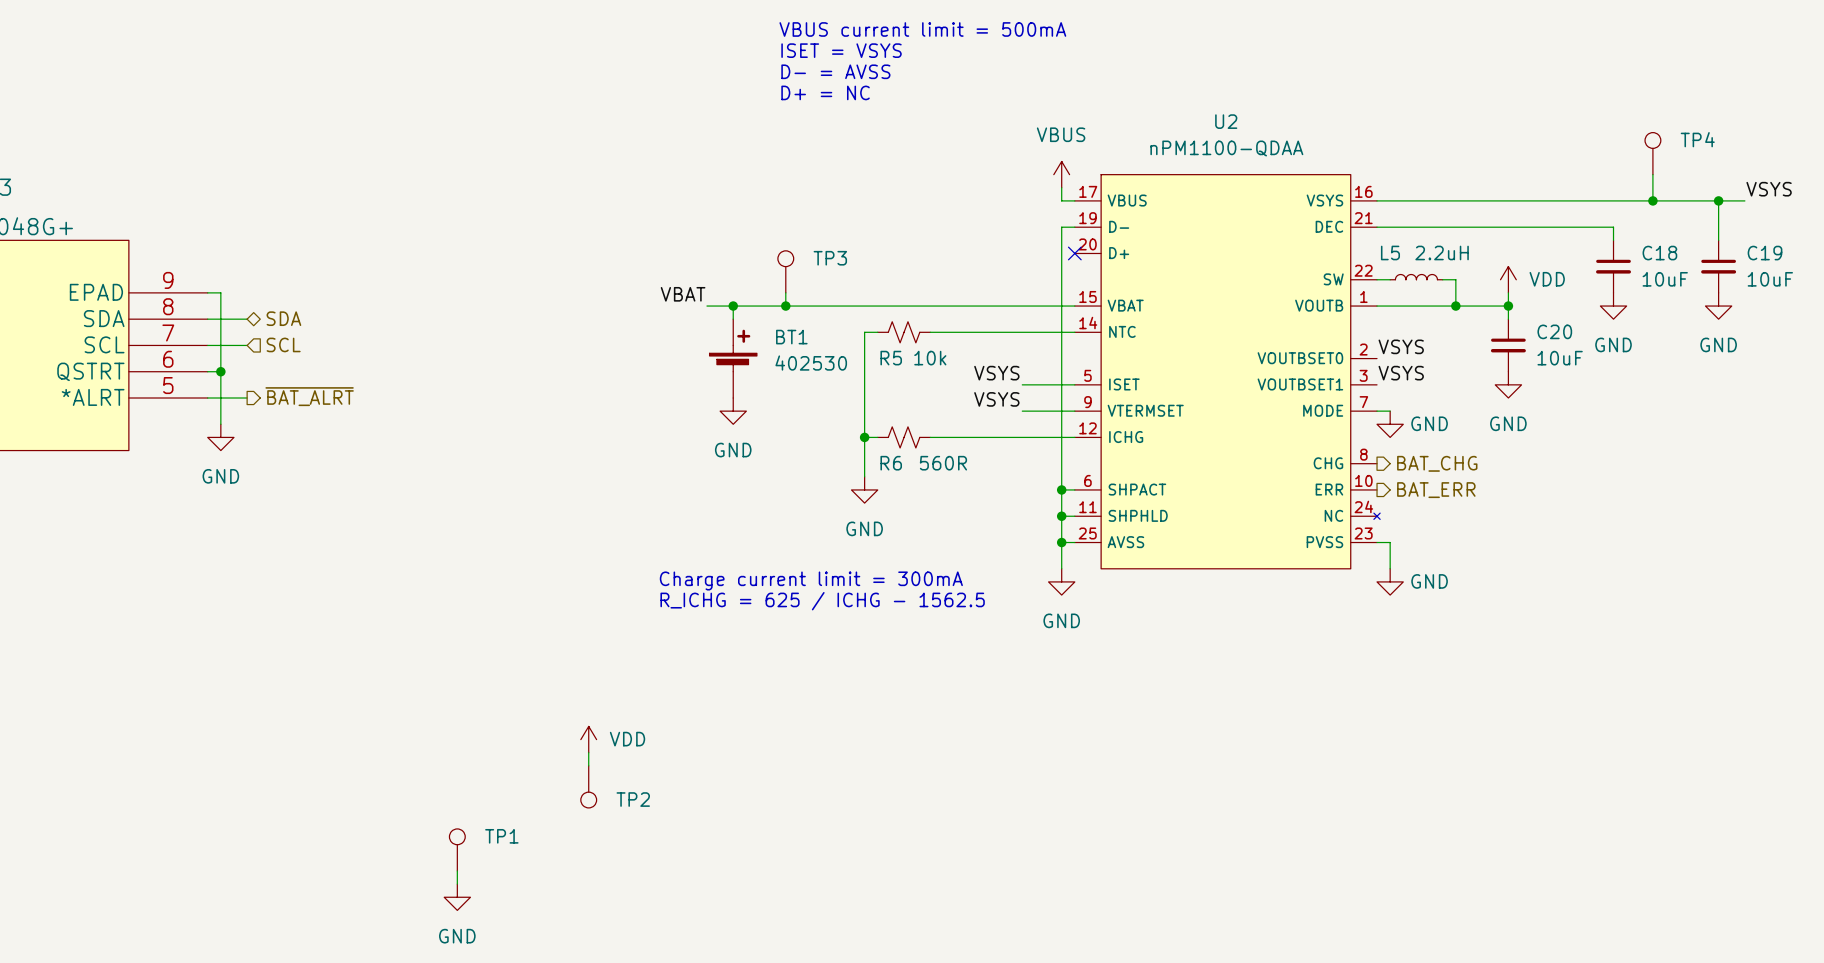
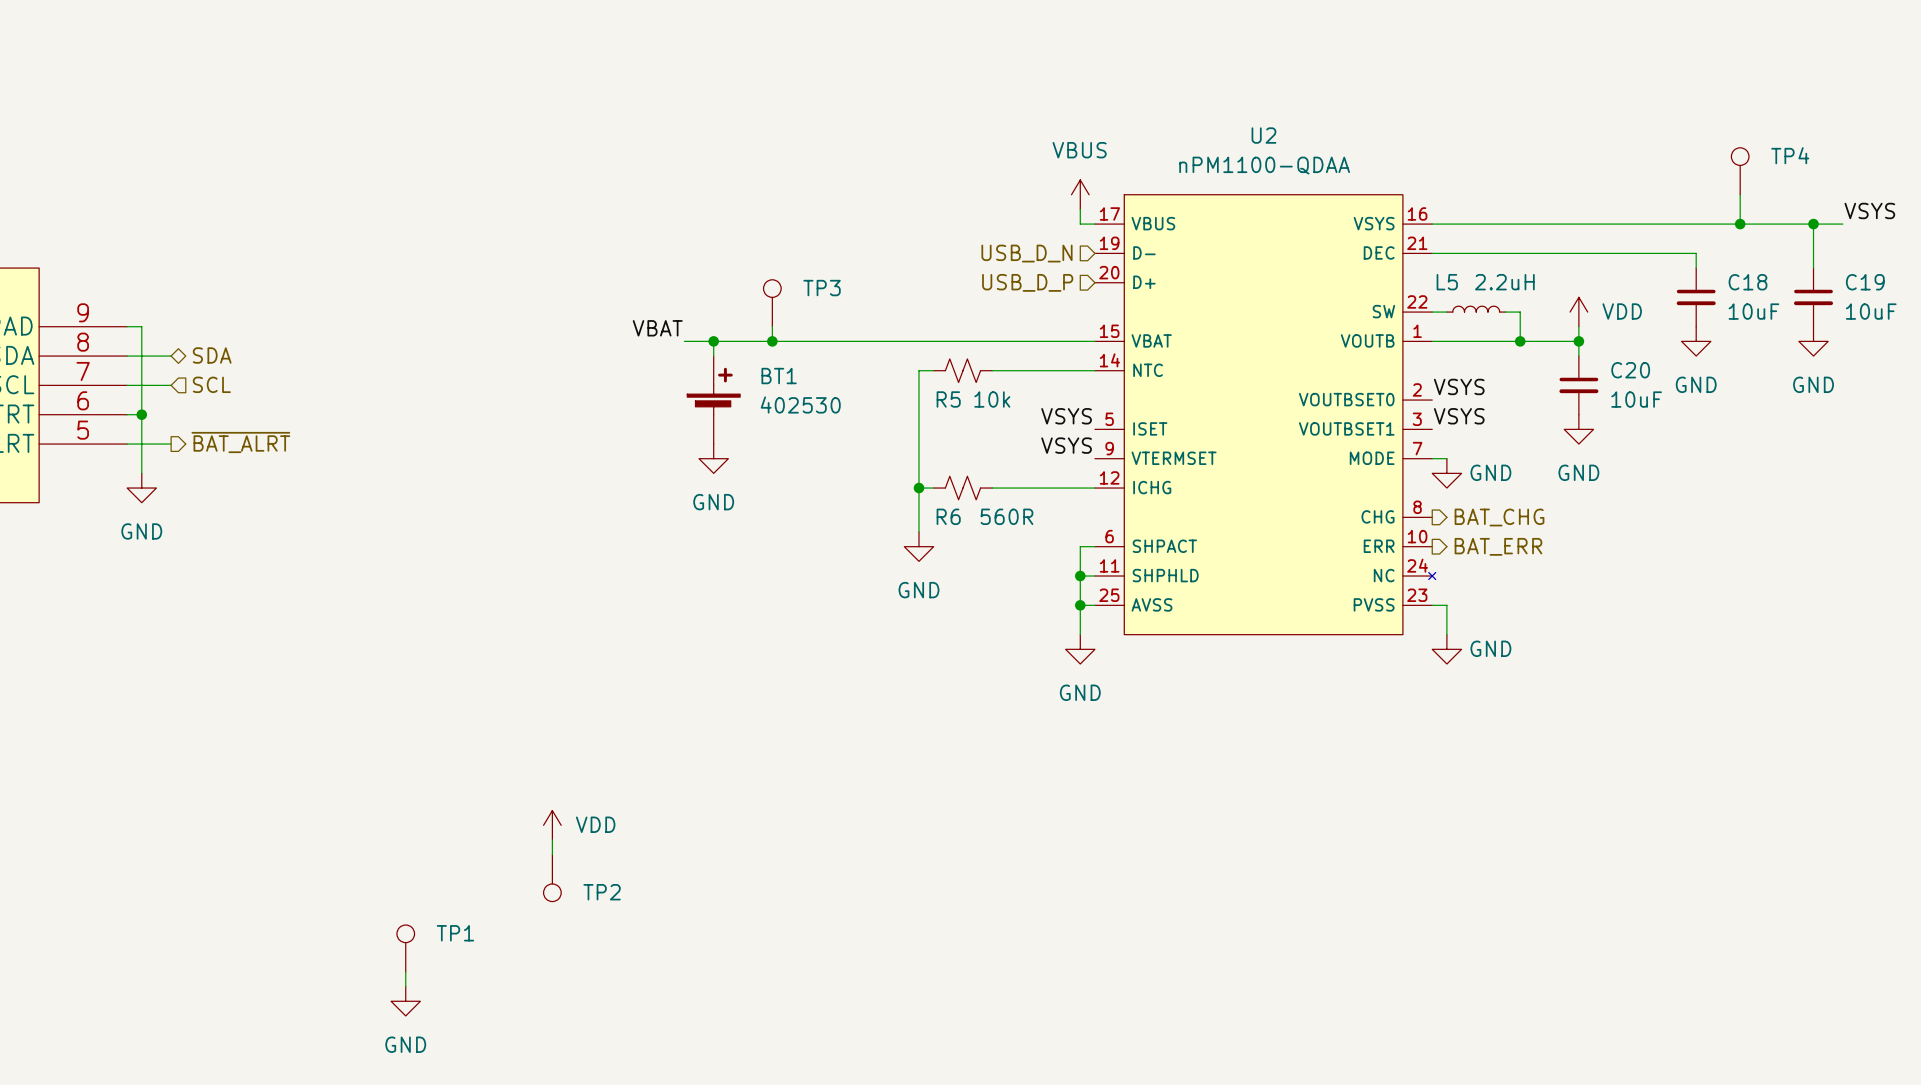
text: VBUS current limit = 500mA (922, 29) -> none
text: ISET = VSYS (841, 50) -> none
text: D- = AVSS (835, 71) -> none
text: D+ = NC (825, 92) -> none
hierarchical label: none -> USB_D_N (1027, 253)
wire: (1074, 227) (1061, 227) (1061, 489) -> none
hierarchical label: none -> USB_D_P (1027, 282)
no-connect mark: (1074, 253) -> none
wire: (877, 332) (864, 332) (864, 476) -> none
R5 position: (904, 332) -> (962, 370)
wire: (930, 332) (982, 332) -> (933, 370) (918, 370) (918, 532)
label: VSYS (996, 373) -> none
label: none -> VSYS (1066, 416)
wire: (1022, 384) (1074, 384) -> none
label: VSYS (996, 399) -> none
label: none -> VSYS (1066, 445)
wire: (1022, 411) (1074, 411) -> none
wire: (864, 437) (877, 437) -> none
junction position: (864, 437) -> (918, 488)
R6 position: (904, 437) -> (962, 488)
power symbol position: GND (864, 489) -> GND (918, 546)
junction: (1061, 489) -> none
text: Charge current limit = 300mA (811, 580) -> none
text: R_ICHG = 625 / ICHG - 1562.5 (822, 601) -> none

